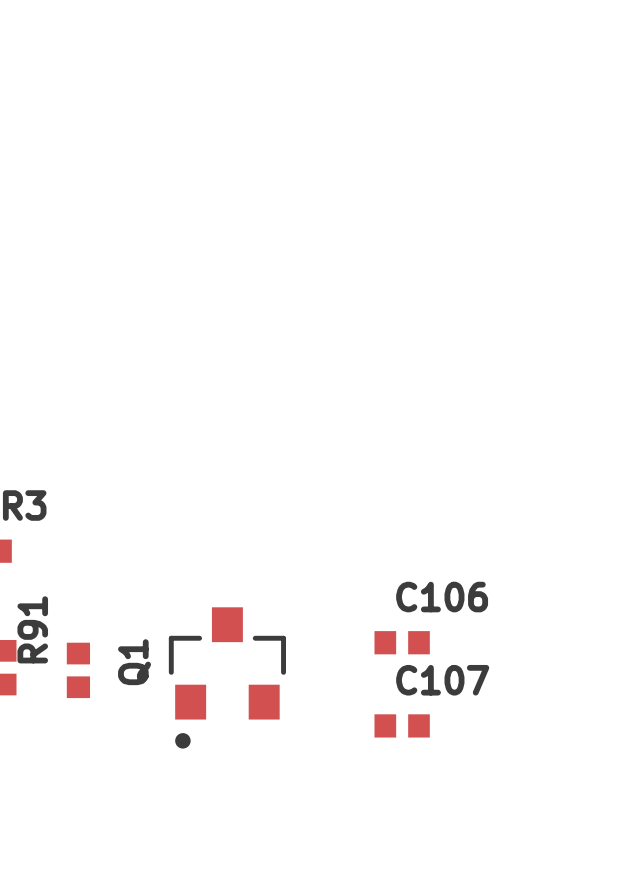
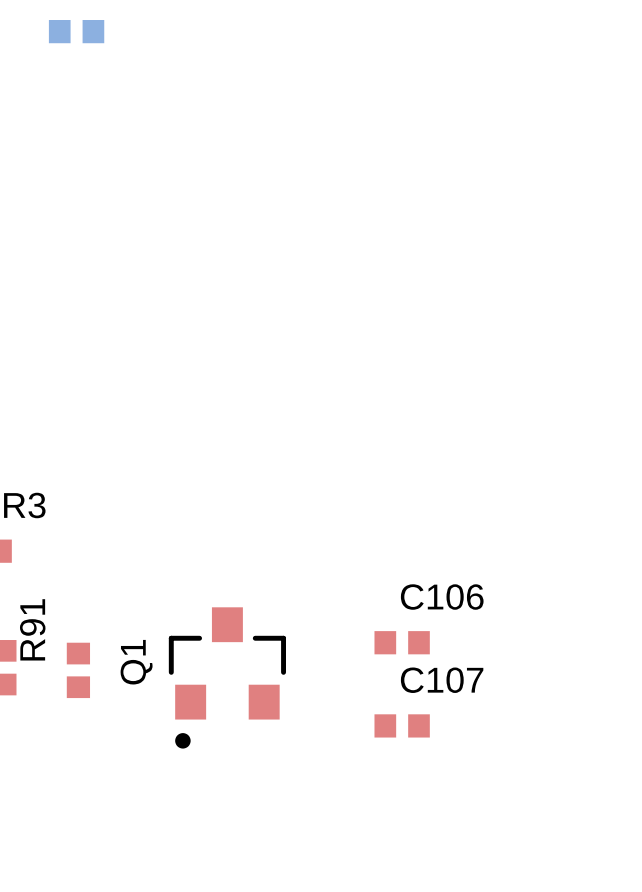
part: none -> (76, 31)

